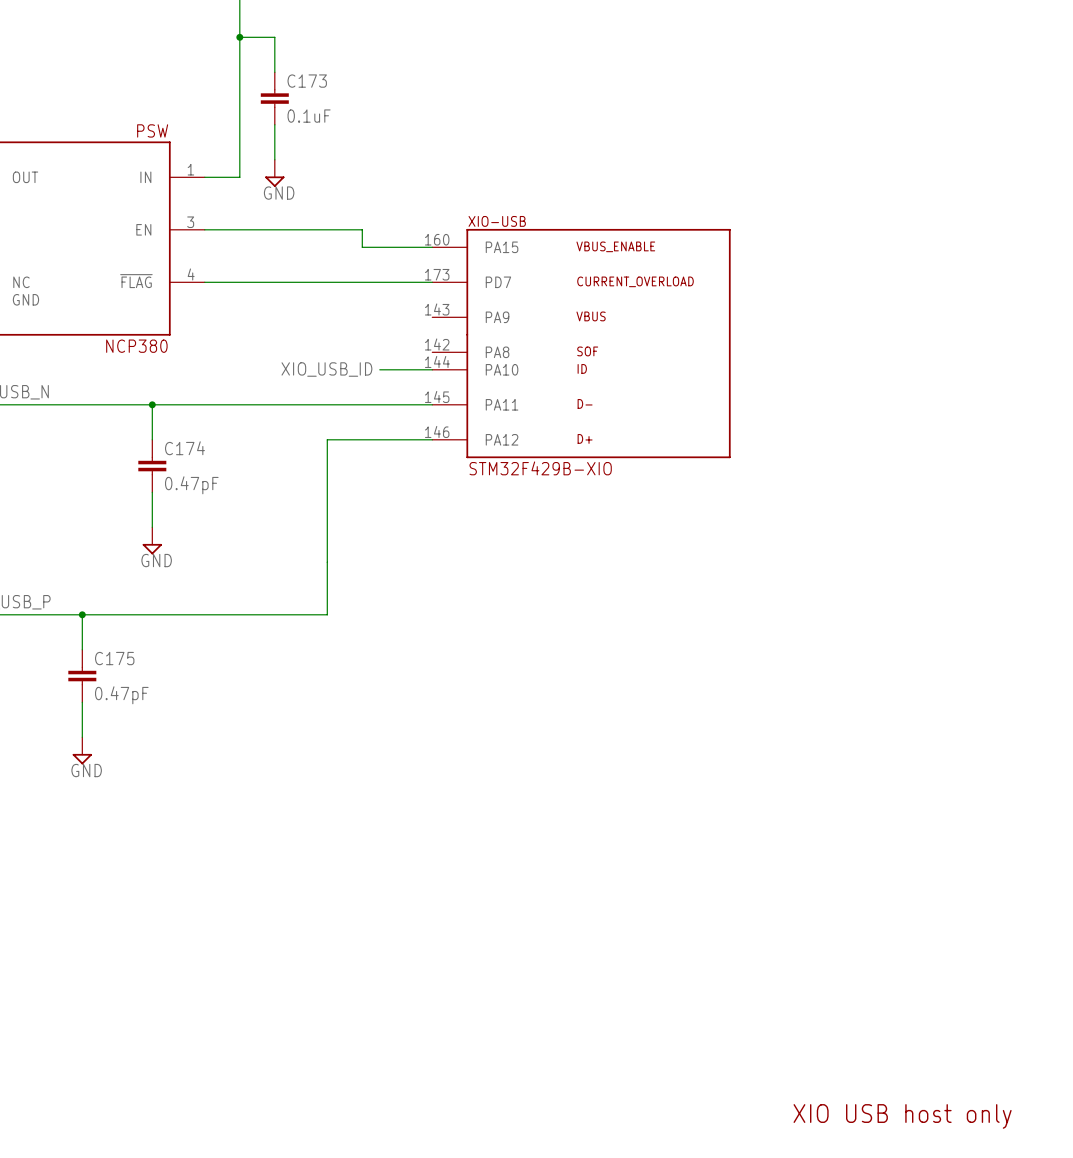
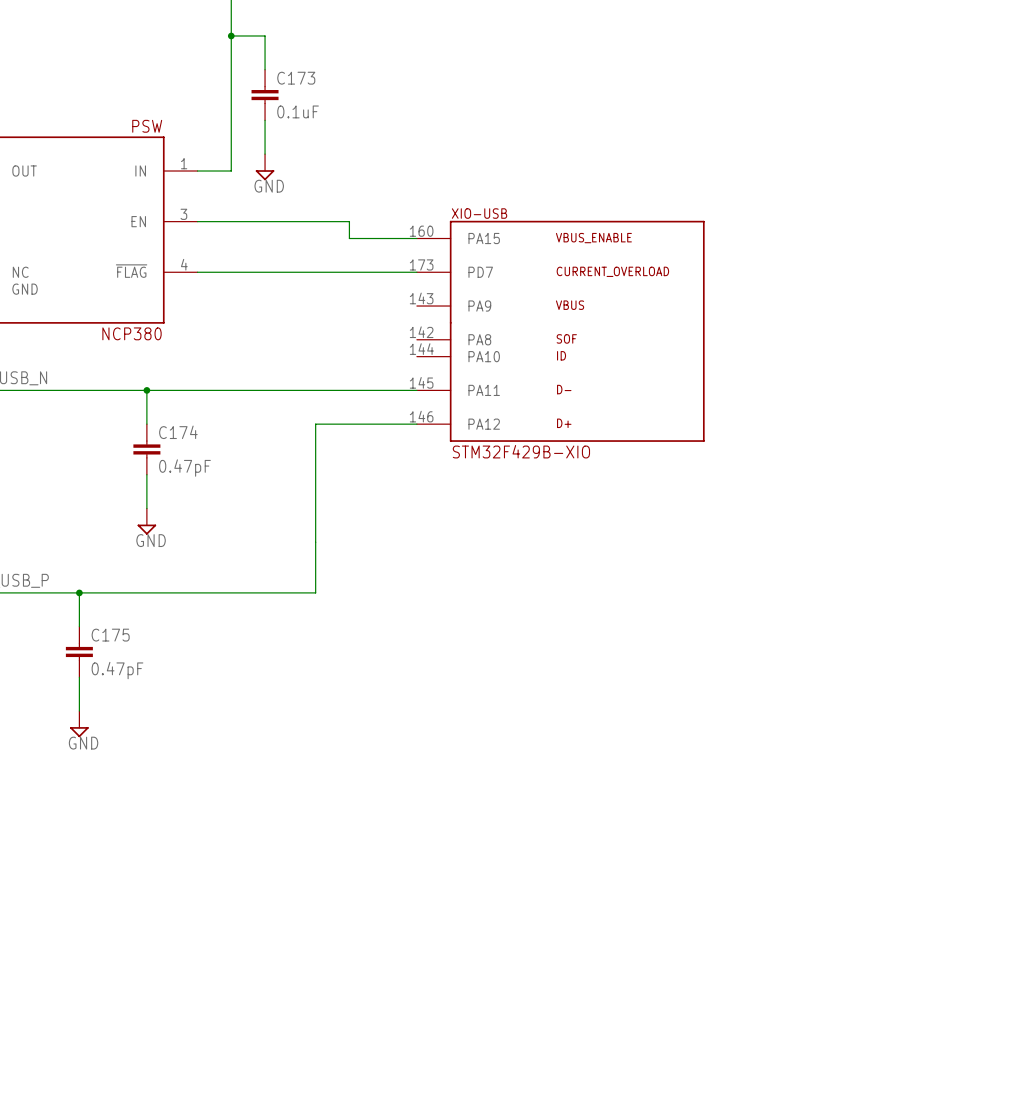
label: XIO_USB_ID (326, 369) -> none
wire: (379, 369) (432, 369) -> none
text: XIO USB host only (902, 1116) -> none

